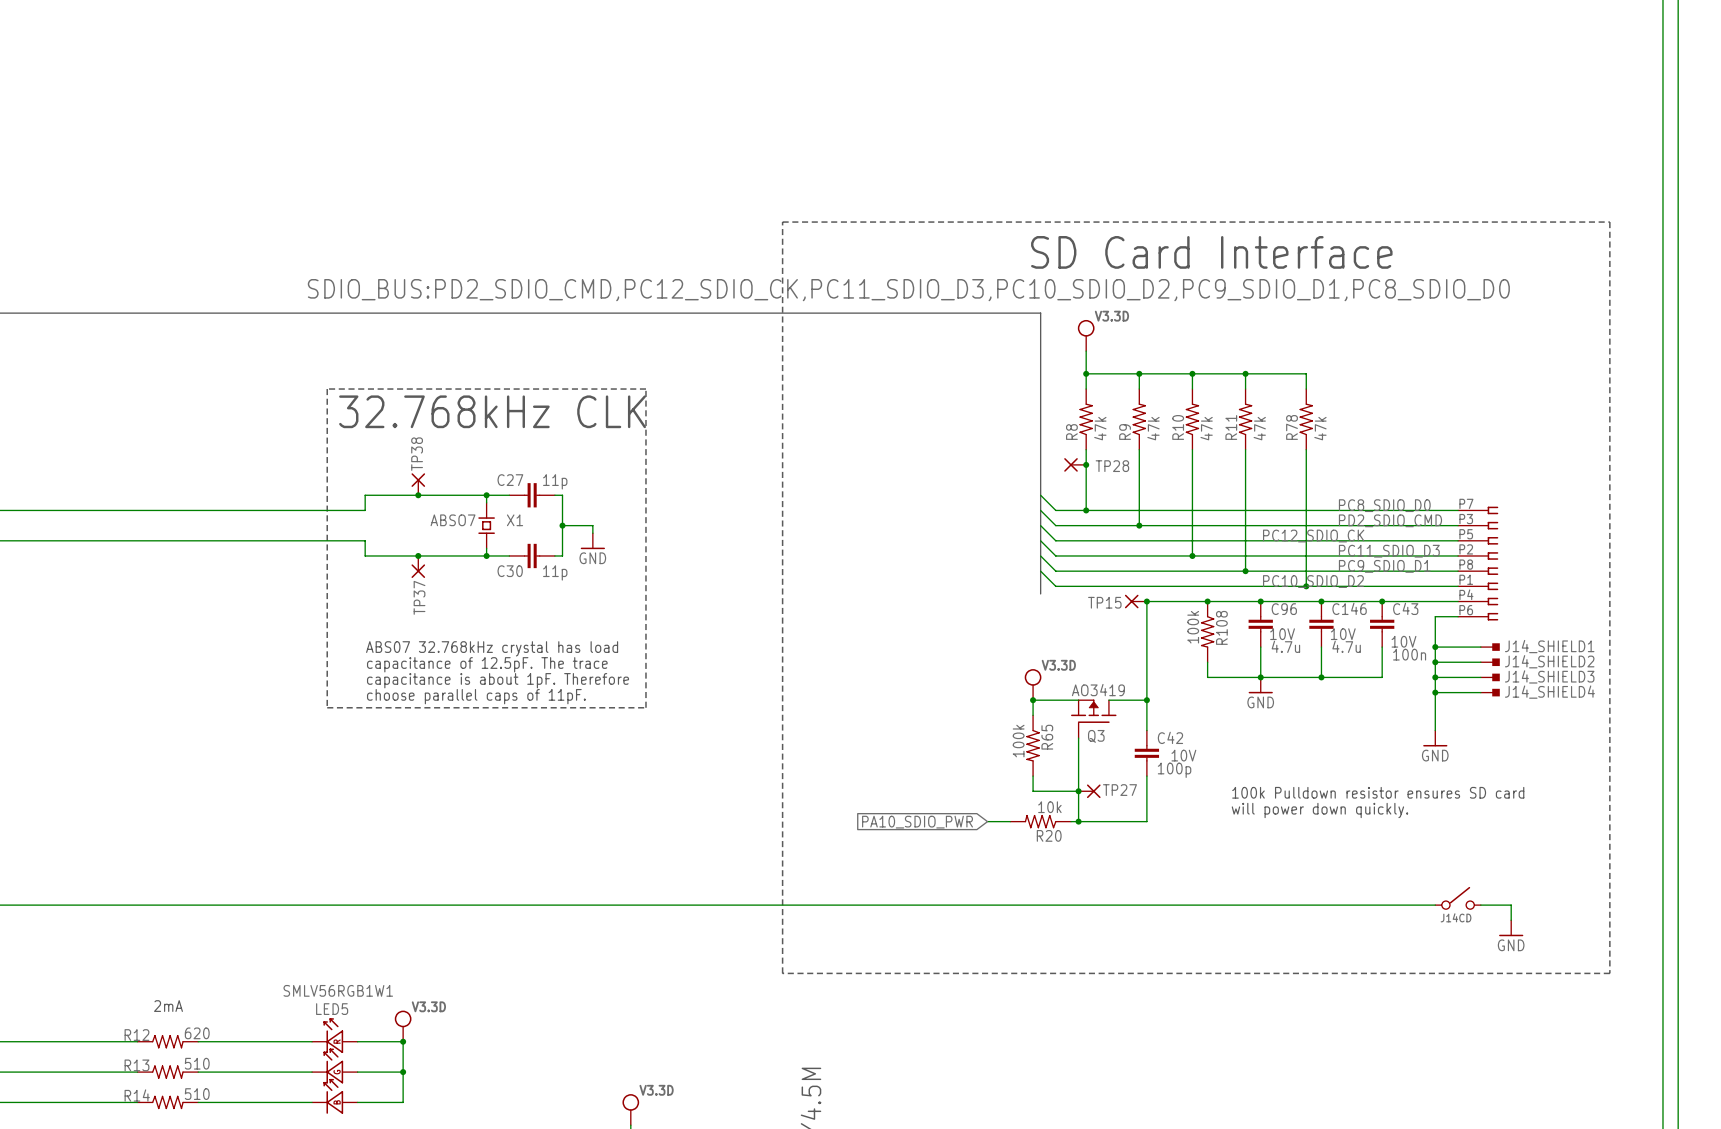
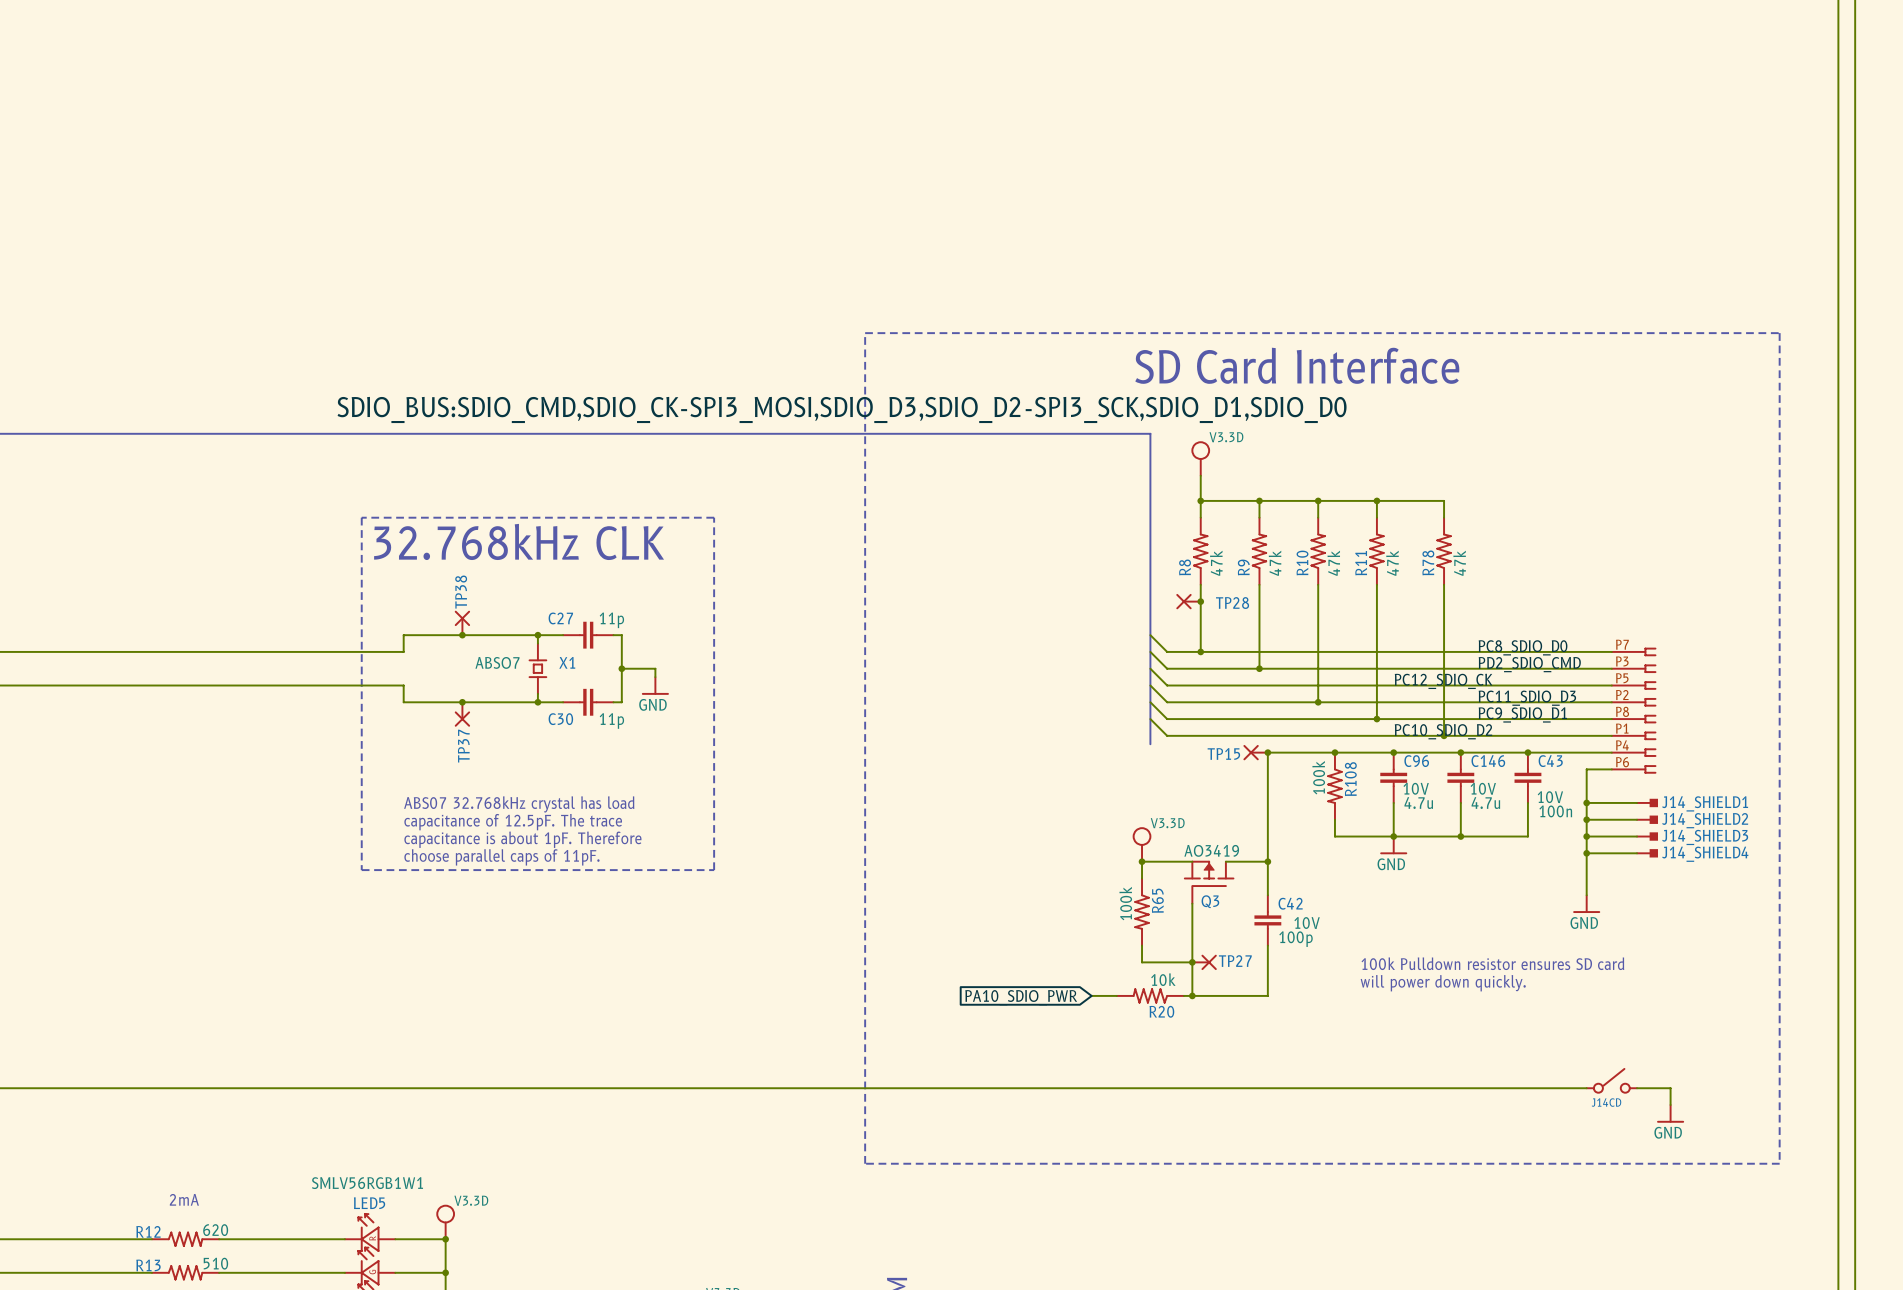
label: SDIO_BUS:PD2_SDIO_CMD,PC12_SDIO_CK,PC11_SDIO_D3,PC10_SDIO_D2,PC9_SDIO_D1,PC8_SDIO_D0 (908, 290) -> SDIO_BUS:SDIO_CMD,SDIO_CK-SPI3_MOSI,SDIO_D3,SDIO_D2-SPI3_SCK,SDIO_D1,SDIO_D0 (842, 409)

